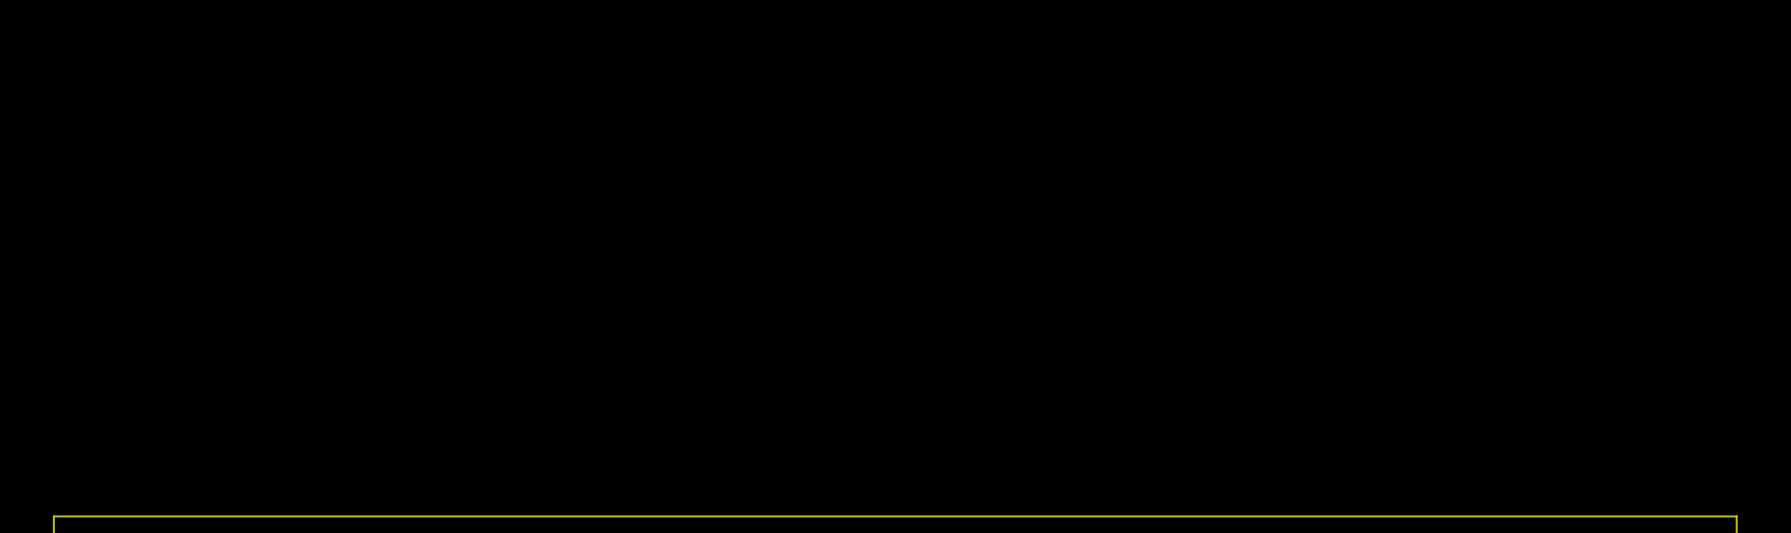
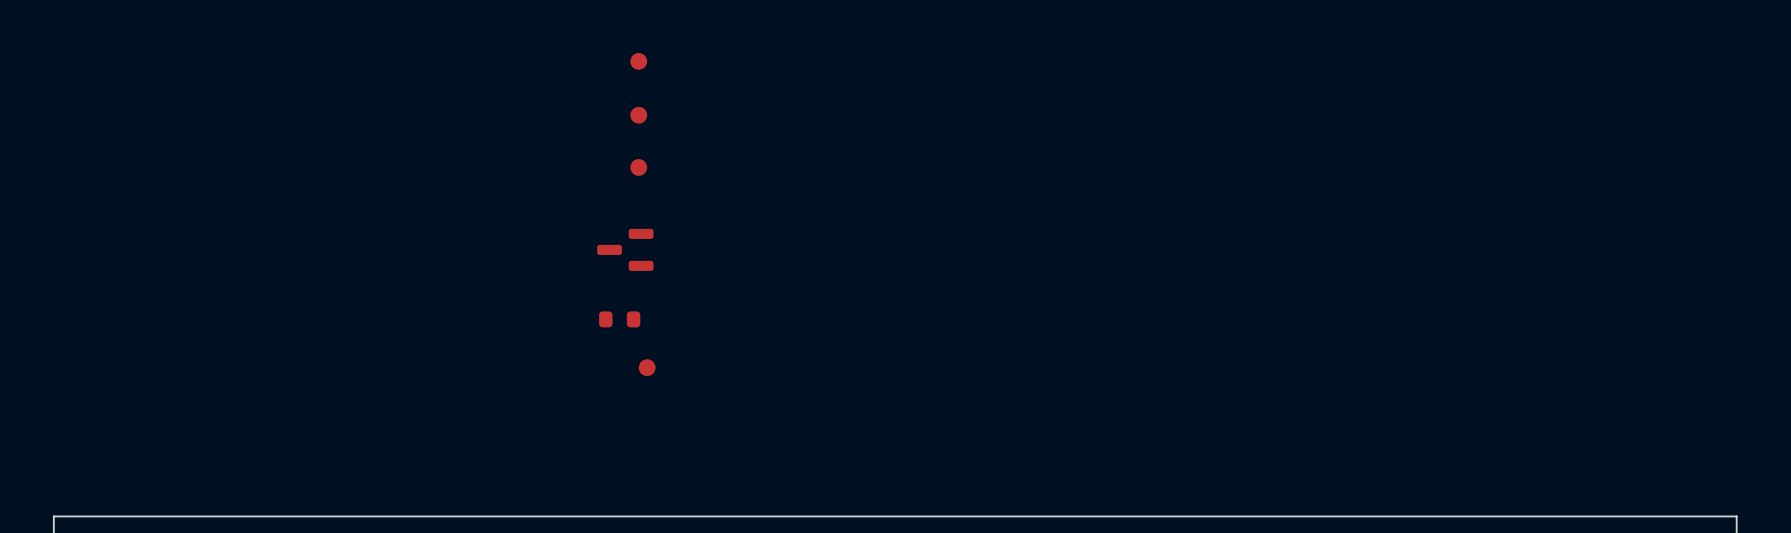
part: none -> (638, 61)
part: none -> (638, 115)
part: none -> (638, 167)
part: none -> (625, 249)
part: none -> (619, 319)
part: none -> (647, 367)

